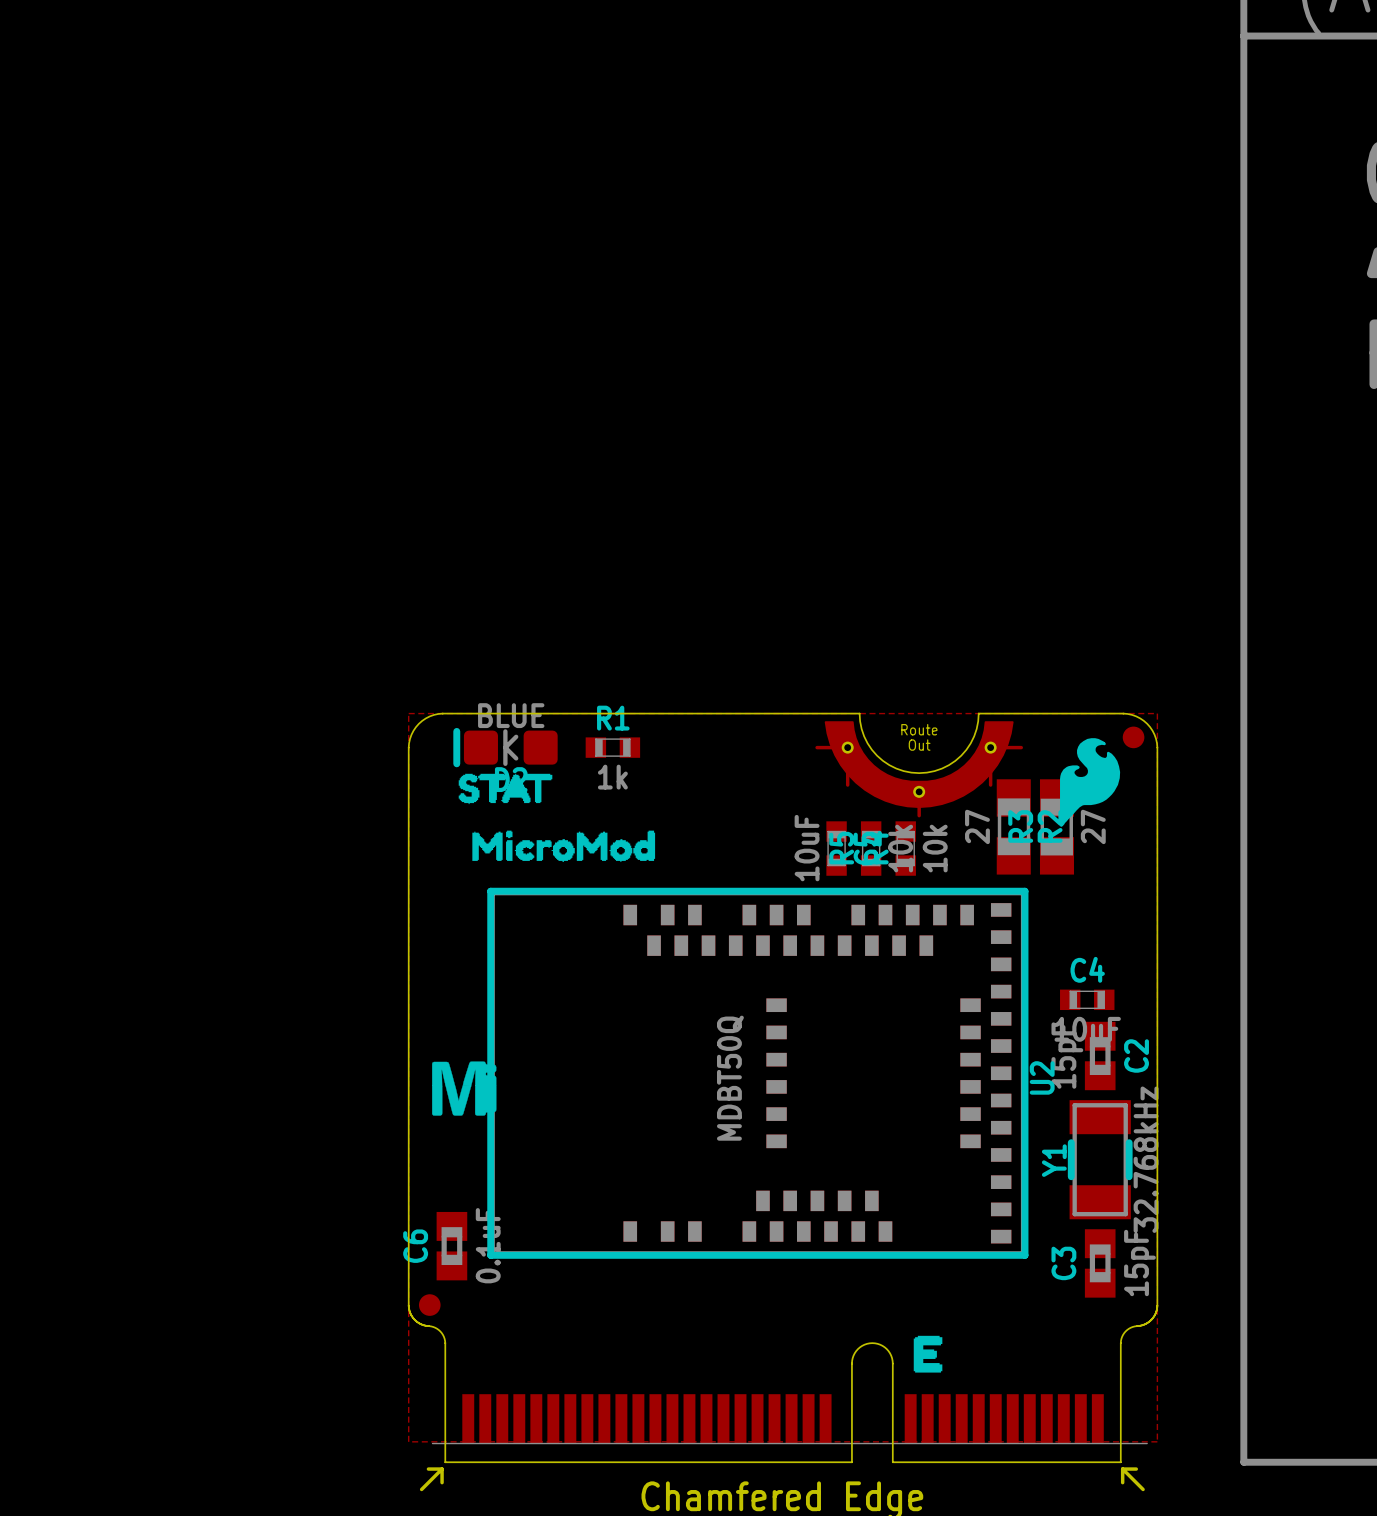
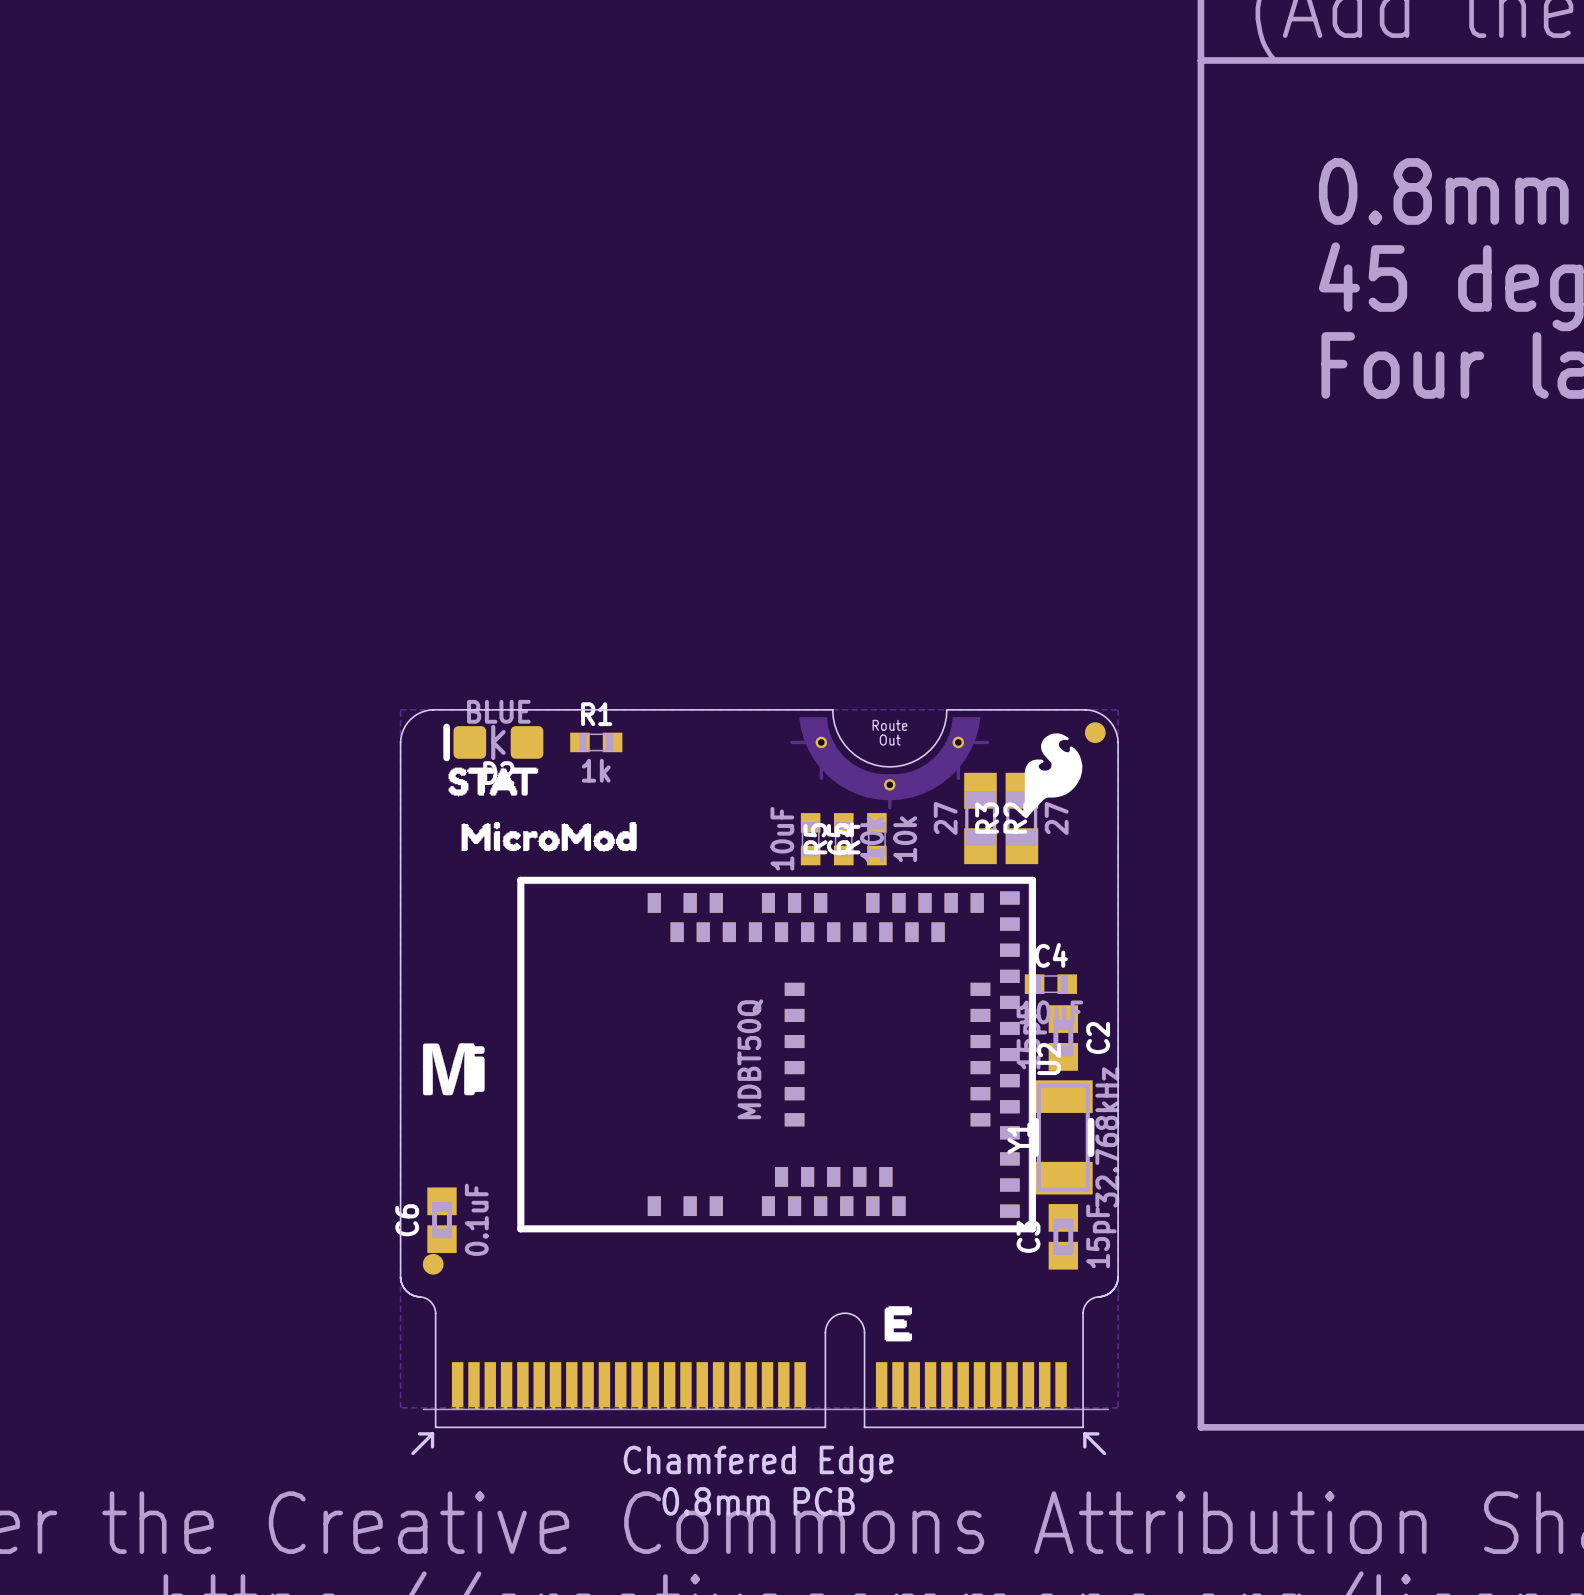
U2 position: (757, 1073) -> (776, 1054)
part position: (429, 1305) -> (433, 1264)

